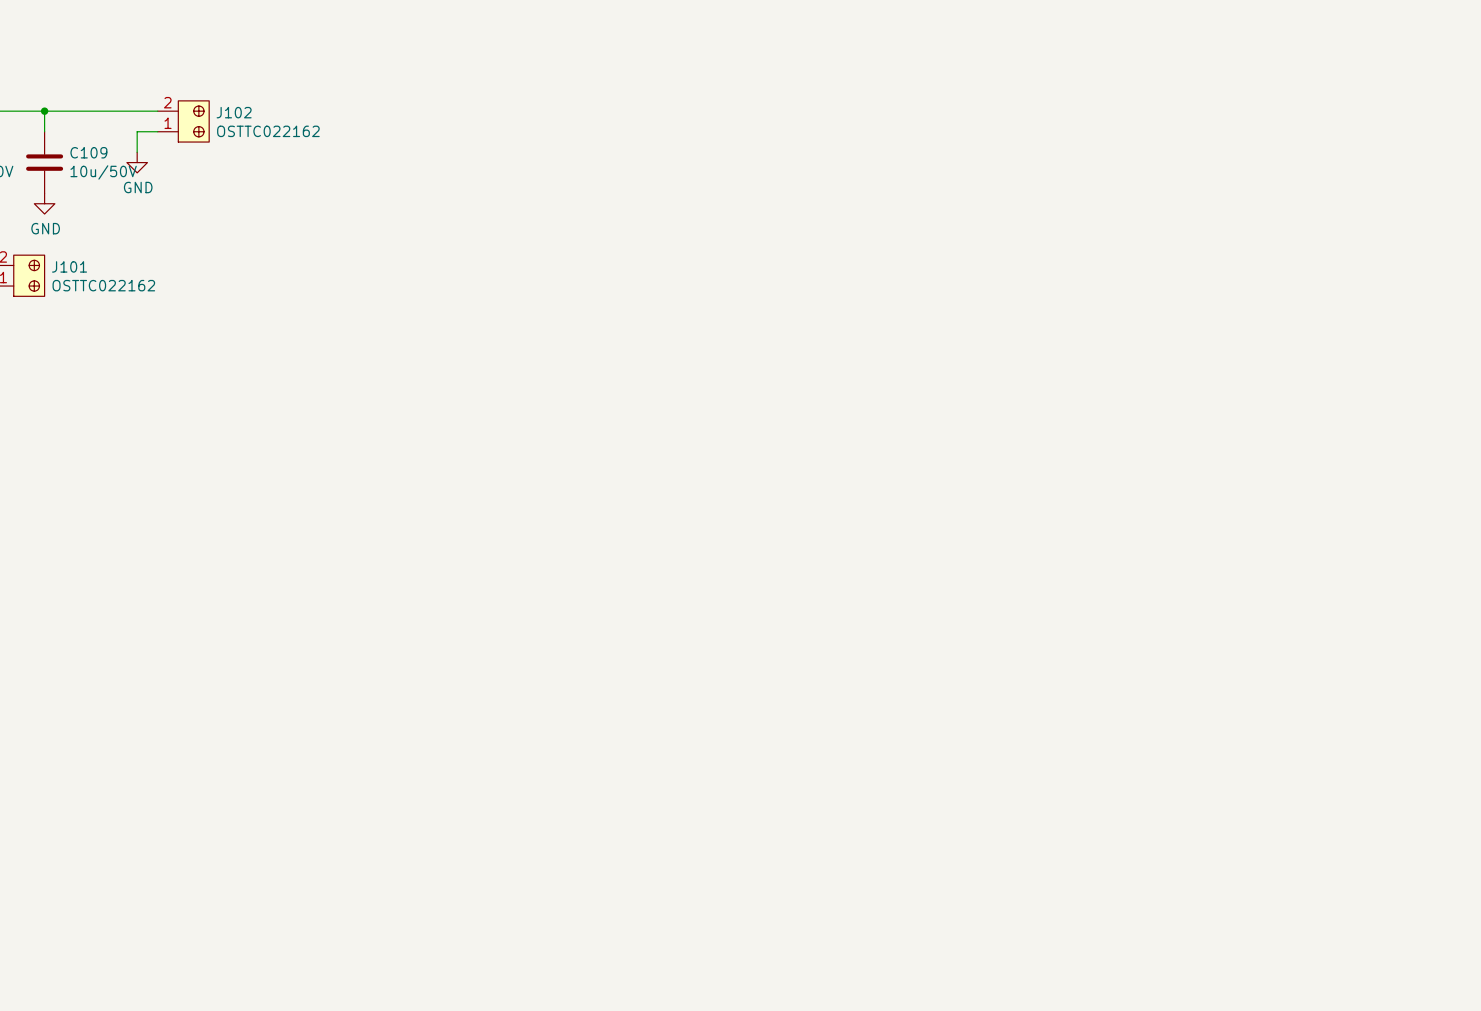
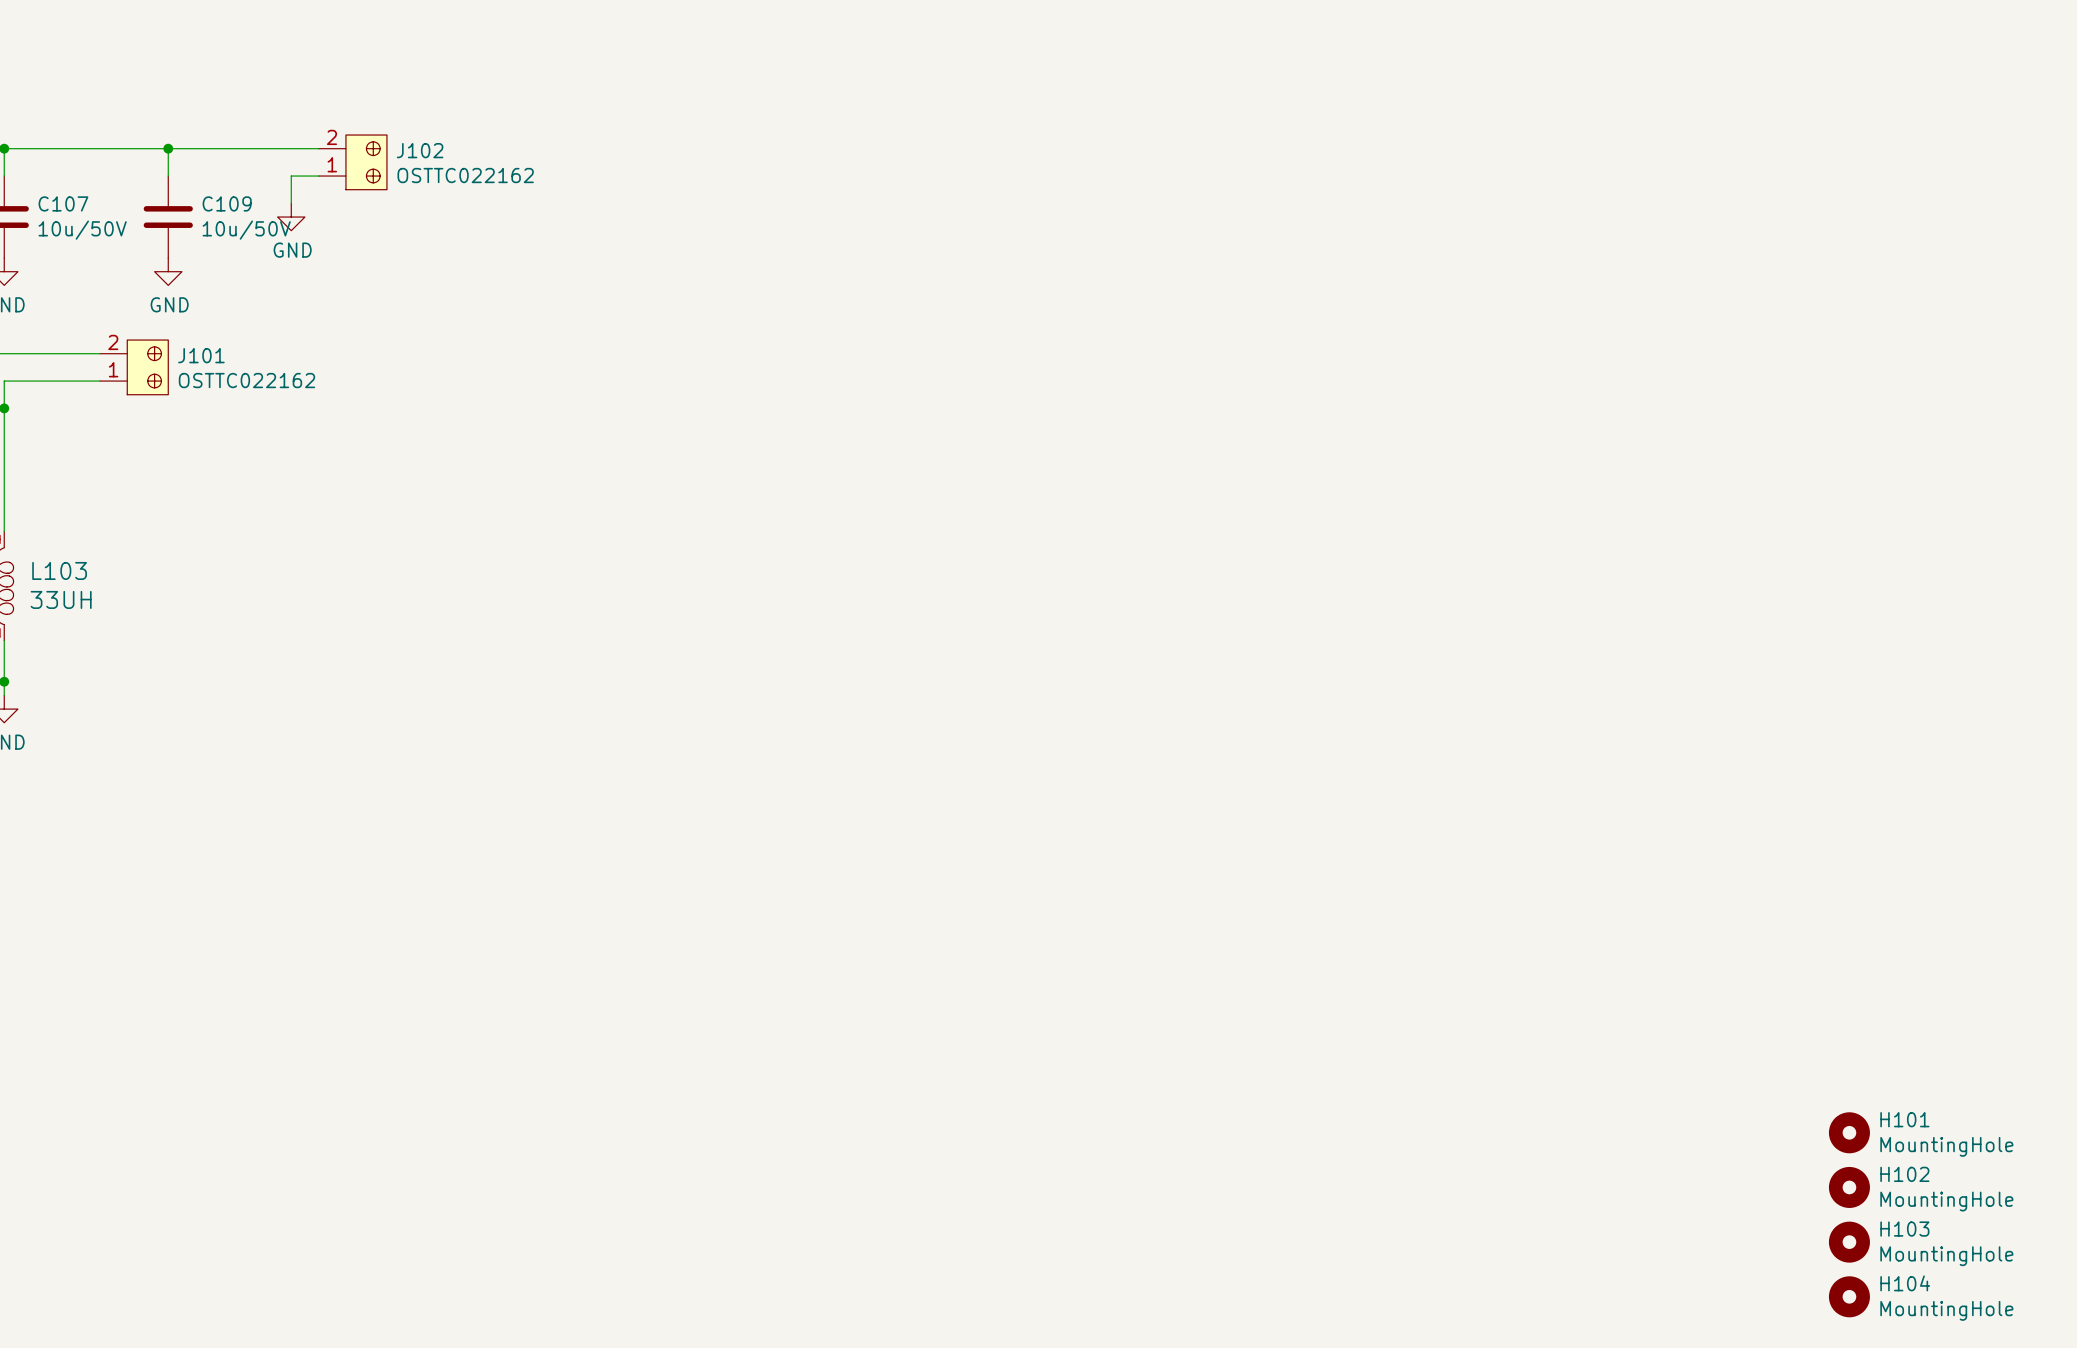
H101: none -> MountingHole (1849, 1132)
H102: none -> MountingHole (1849, 1187)
H103: none -> MountingHole (1849, 1242)
H104: none -> MountingHole (1849, 1296)

